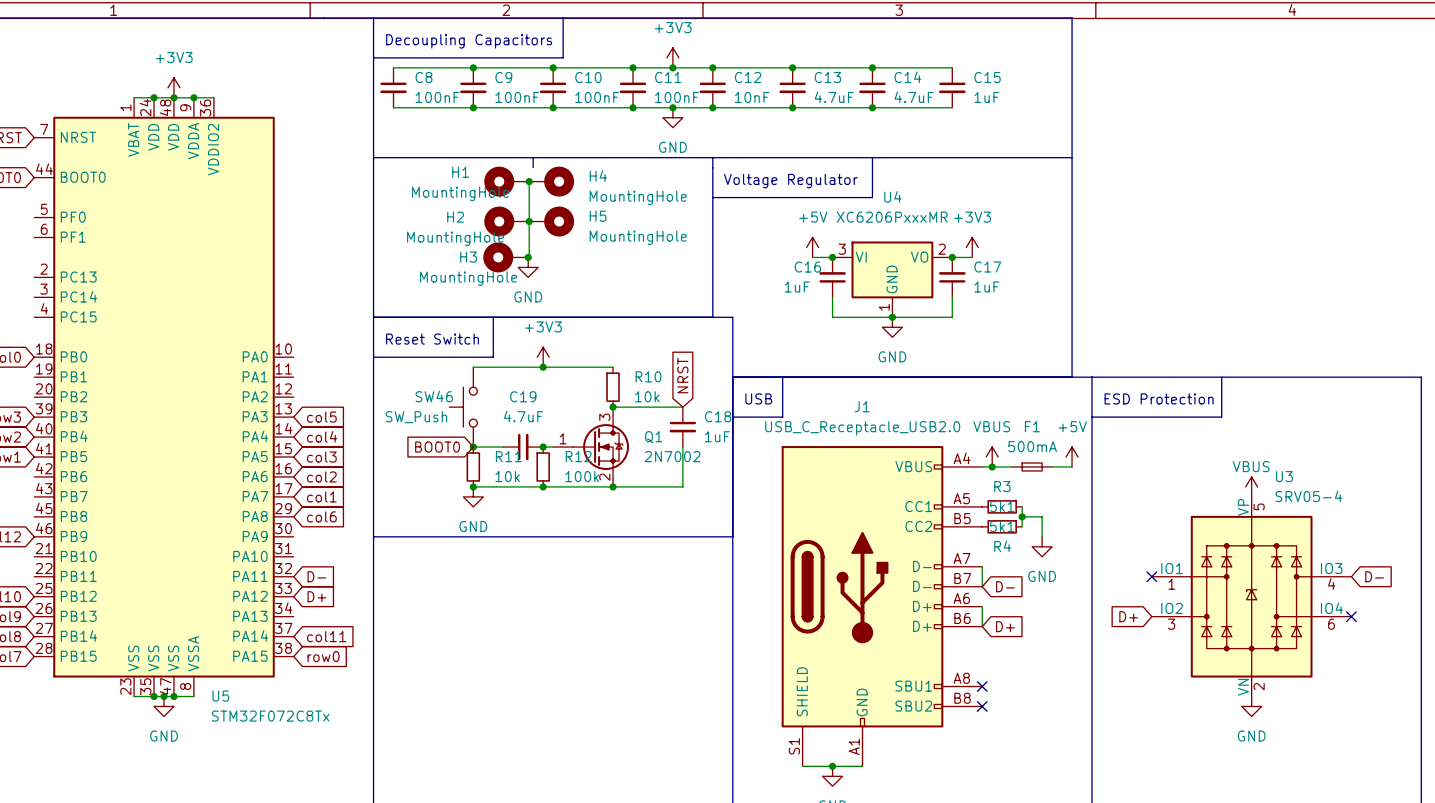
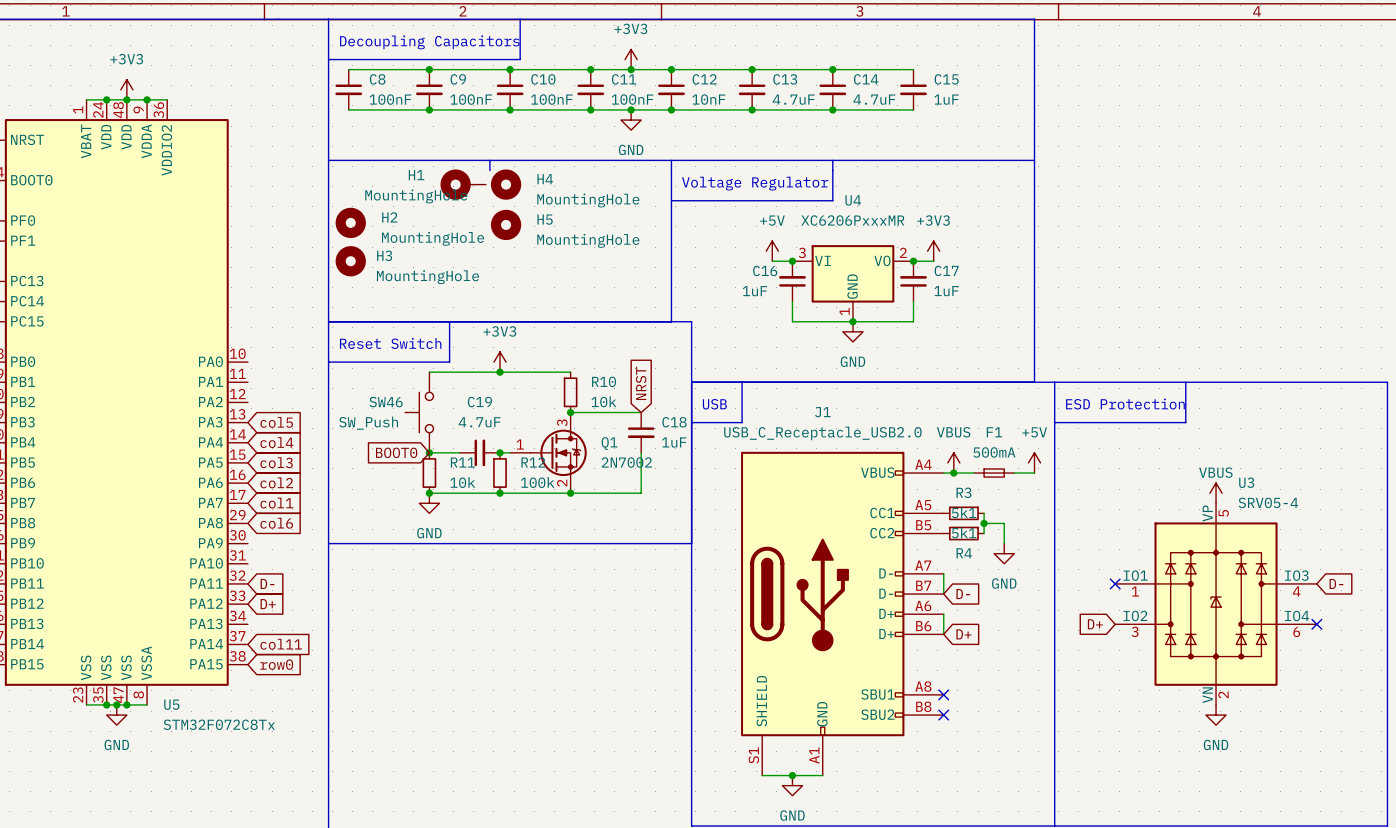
H4 symbol: [529, 166, 575, 197] -> [490, 169, 522, 200]
wire: (529, 181) (528, 257) -> none
junction: (529, 181) -> none
H2 symbol: [484, 206, 530, 237] -> [335, 207, 366, 239]
H5 symbol: [529, 206, 575, 237] -> [490, 209, 522, 241]
H2 name position: H2 (455, 217) -> H2 (389, 217)
junction: (529, 221) -> none
H2 value position: MountingHole (455, 238) -> MountingHole (433, 238)
H3 symbol: [483, 242, 529, 273] -> [335, 246, 366, 277]
H3 name position: H3 (468, 257) -> H3 (384, 255)
junction: (528, 257) -> none
power symbol: GND (528, 267) -> none
H3 value position: MountingHole (468, 278) -> MountingHole (427, 277)

